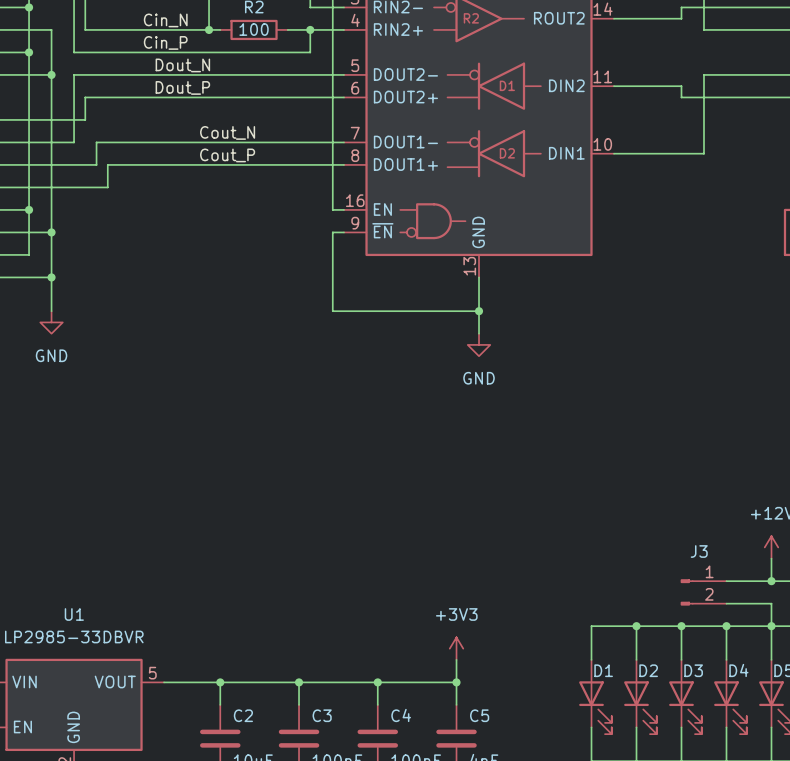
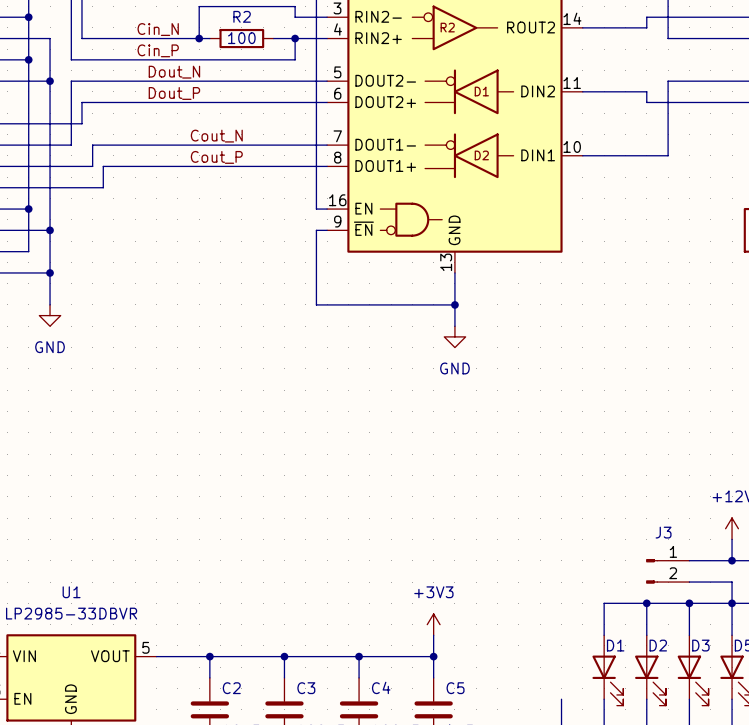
wire: (636, 626) (591, 626) (591, 659) -> none
junction: (636, 626) -> none
D2 name: D2 (648, 670) -> D1 (615, 645)
D3 name: D3 (693, 670) -> D2 (658, 645)
D4 name: D4 (738, 670) -> D3 (700, 645)
D1: (595, 697) -> none

